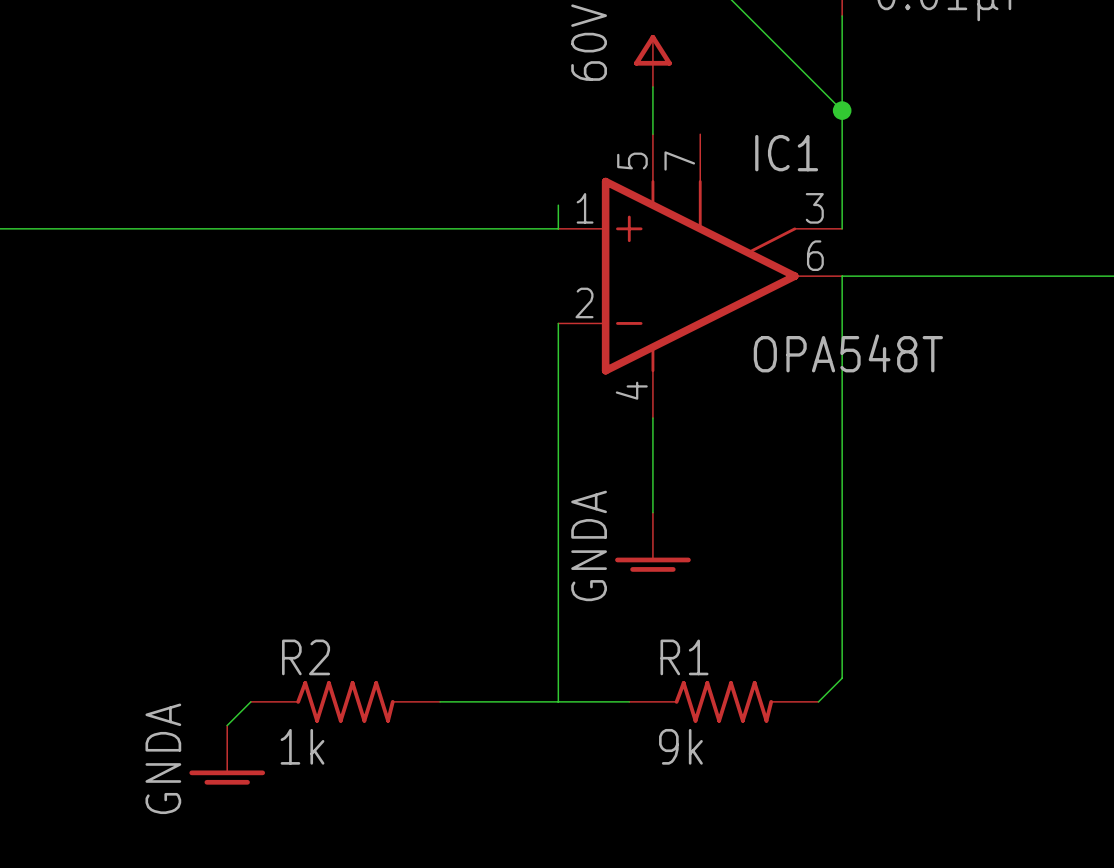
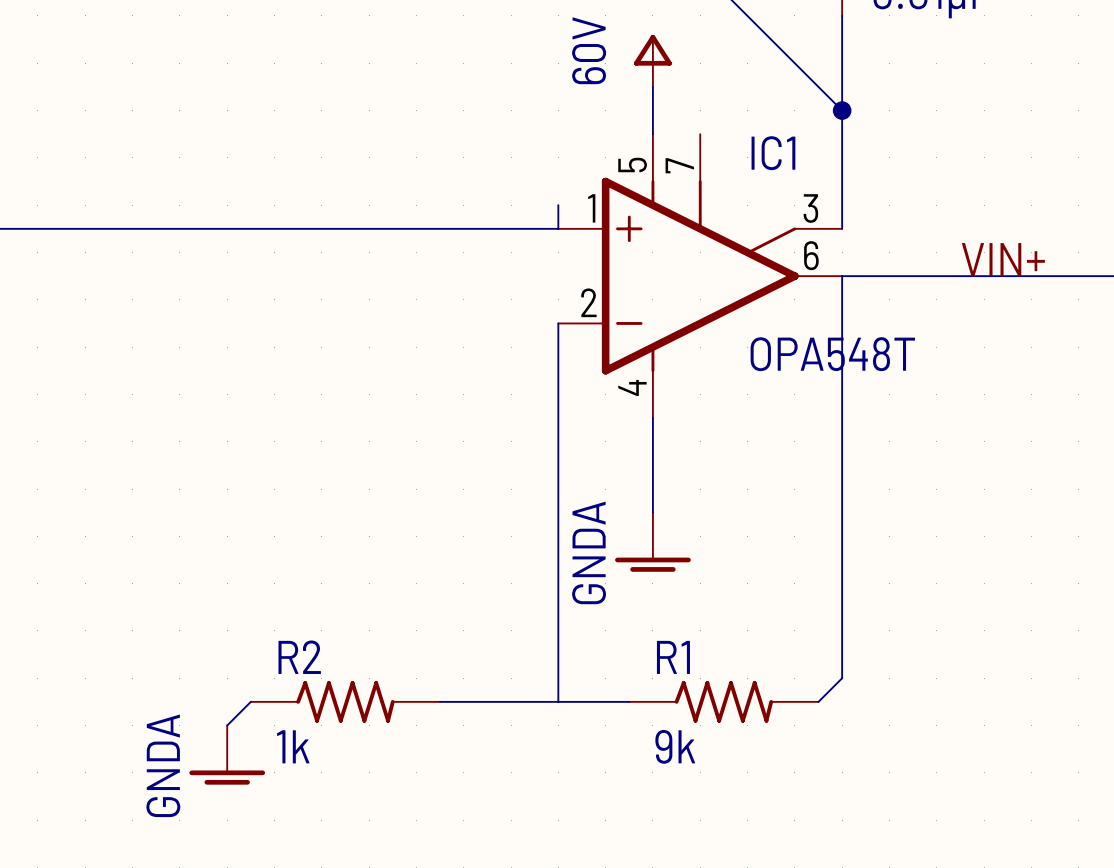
label: none -> VIN+ (1003, 259)

